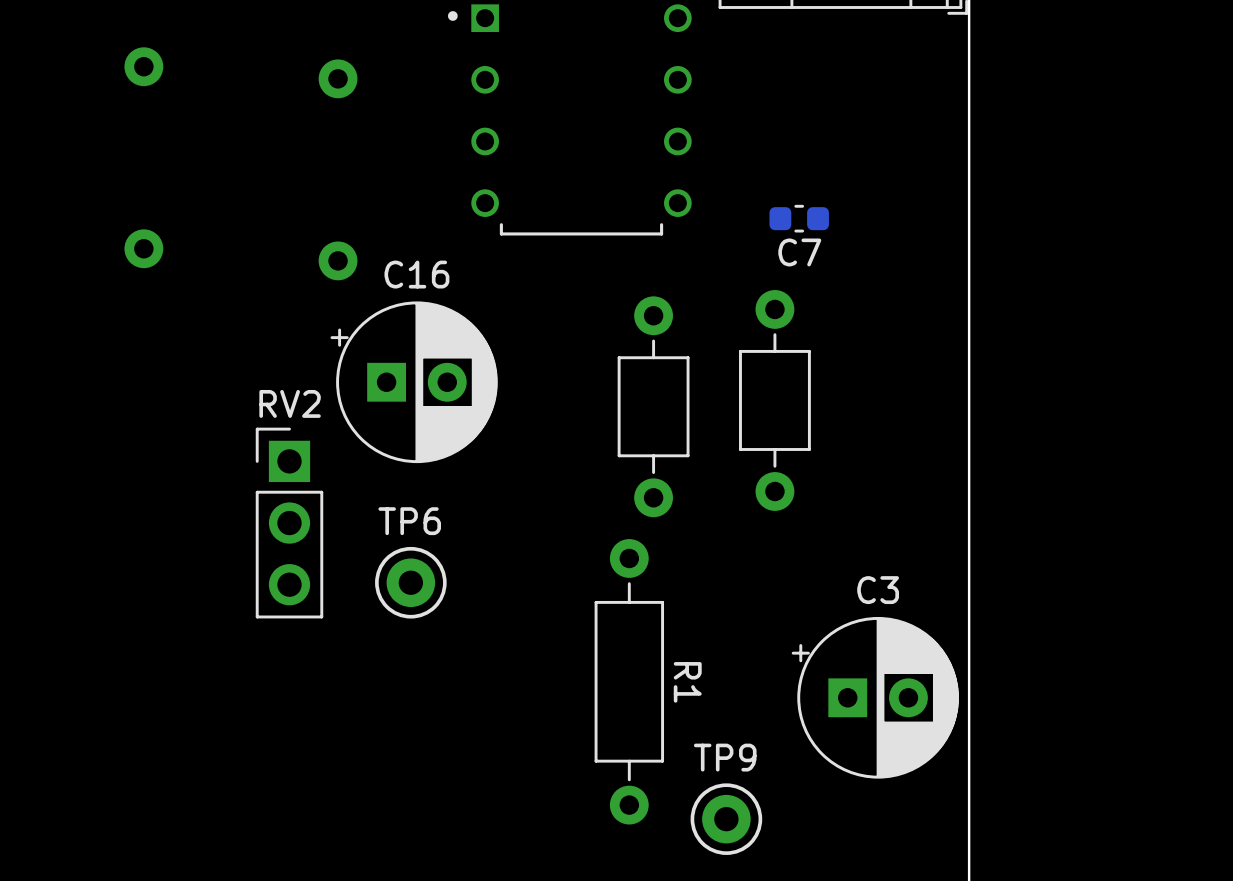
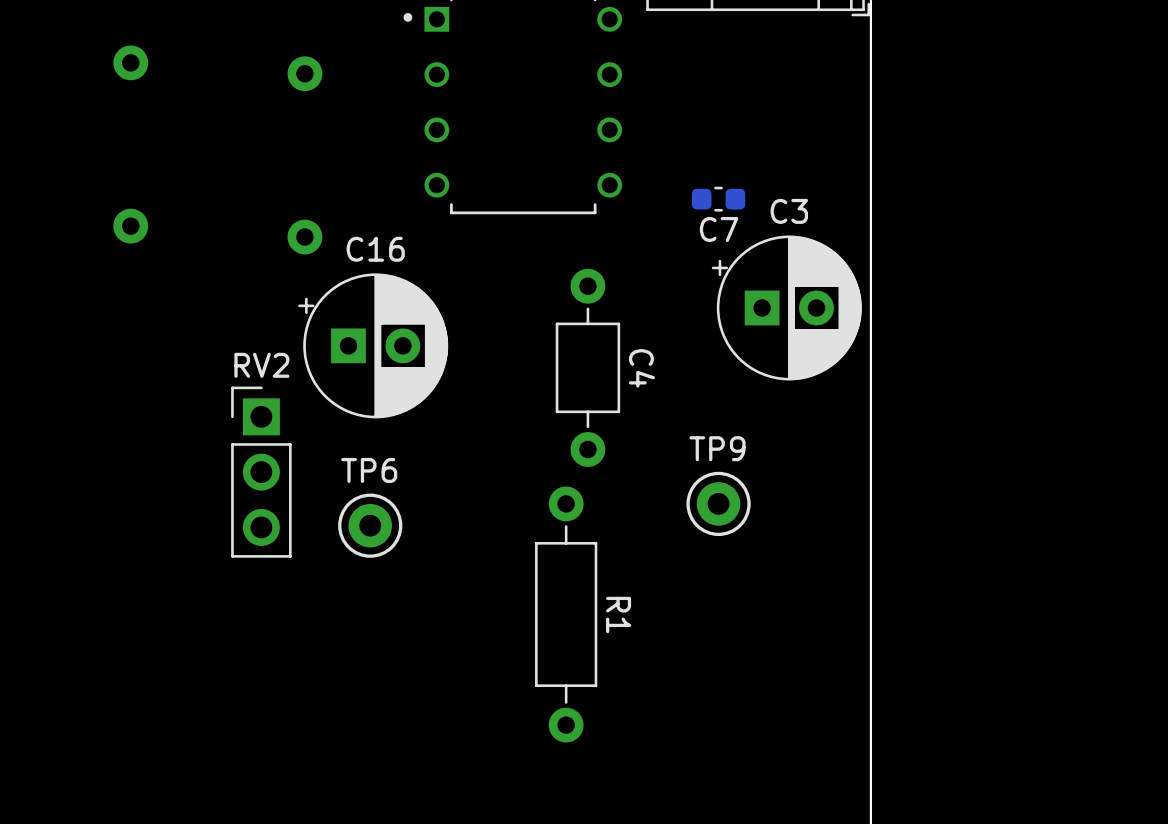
part: (774, 400) -> none
C4 name: none -> C4 (641, 368)
C3 position: (875, 697) -> (786, 307)
TP9 position: (726, 819) -> (718, 503)

